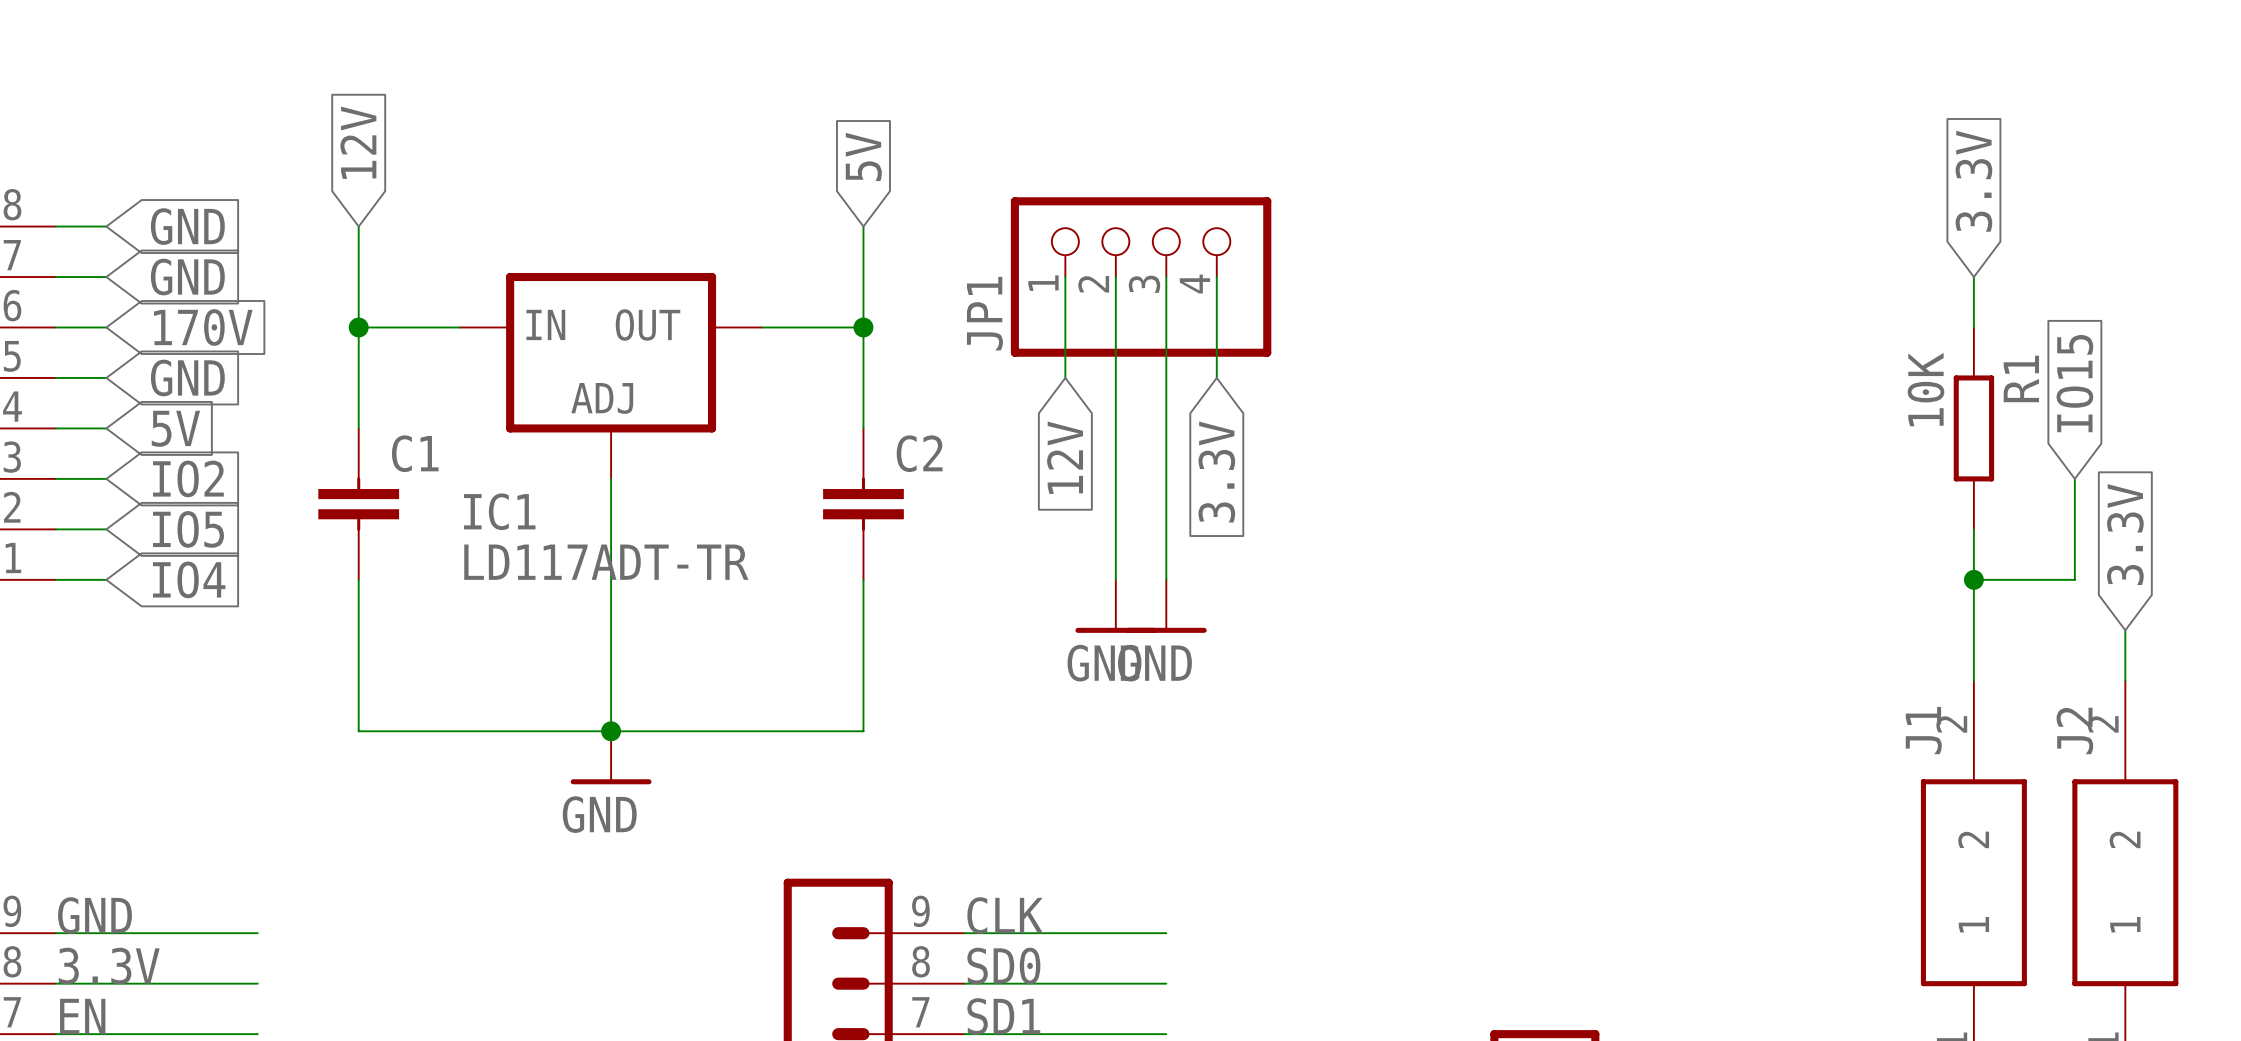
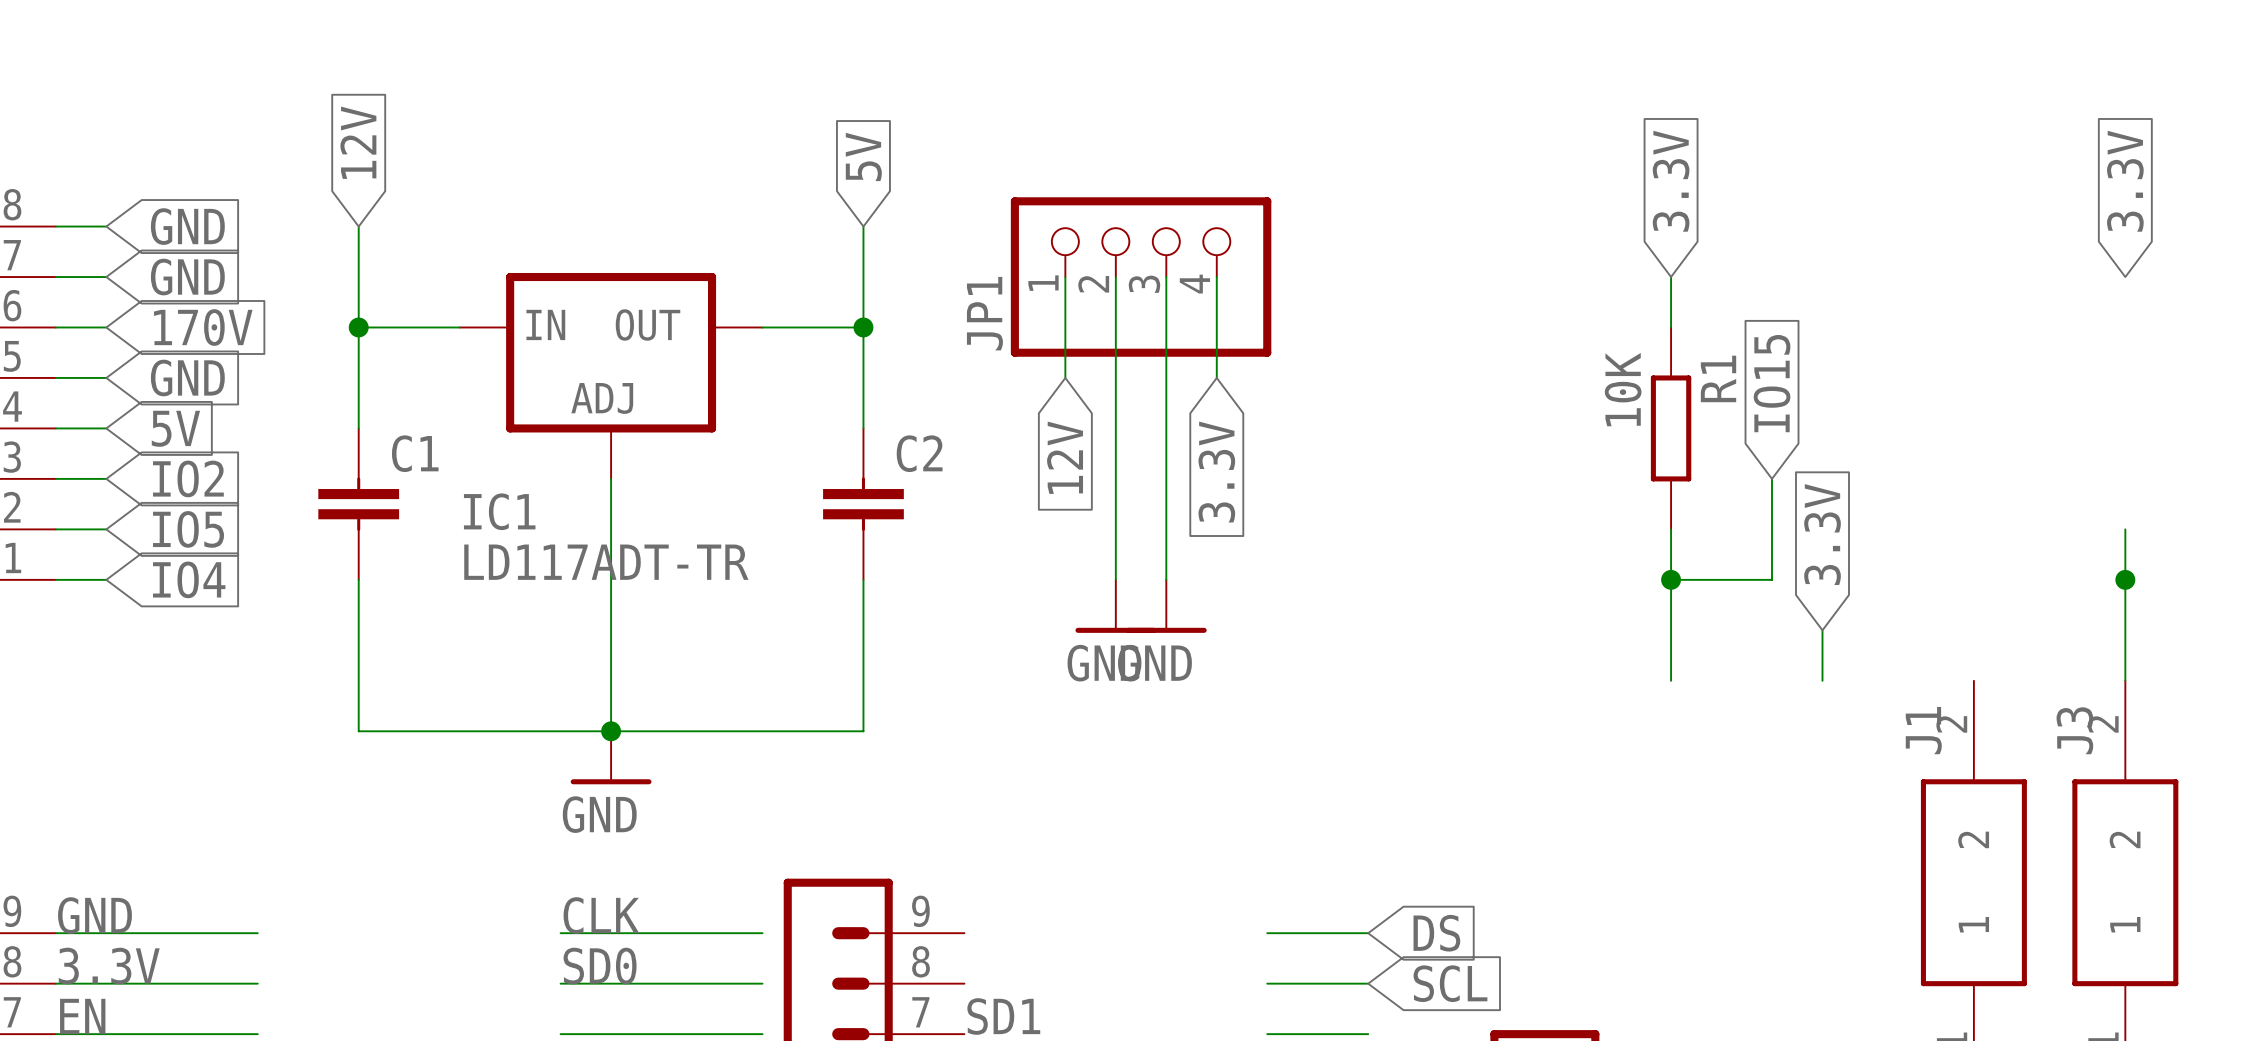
global label: none -> 3.3V (1671, 181)
global label: 3.3V (1973, 181) -> none
global label: none -> 3.3V (2125, 181)
wire: (1973, 277) (1973, 327) -> (1671, 277) (1671, 327)
global label position: IO15 (2074, 383) -> IO15 (1772, 383)
R1 position: (1973, 428) -> (1671, 428)
wire: (2074, 478) (2074, 579) (1973, 579) -> (1772, 478) (1772, 579) (1671, 579)
wire: (1973, 529) (1973, 680) -> (1671, 529) (1671, 680)
wire: none -> (2125, 529) (2125, 630)
global label: none -> 3.3V (1822, 534)
global label: 3.3V (2125, 534) -> none
junction: none -> (1671, 579)
junction: (1973, 579) -> none
junction: none -> (2125, 579)
wire: none -> (1822, 630) (1822, 680)
J2 name: J2 (2074, 730) -> J3 (2074, 730)
label position: CLK (1005, 915) -> CLK (601, 915)
wire: (964, 933) (1166, 933) -> (560, 933) (762, 933)
wire: none -> (1267, 933) (1368, 933)
global label: none -> DS (1436, 933)
label position: SD0 (1003, 966) -> SD0 (600, 966)
wire: (964, 983) (1166, 983) -> (560, 983) (762, 983)
wire: none -> (1267, 983) (1368, 983)
global label: none -> SCL (1450, 983)
wire: (964, 1034) (1166, 1034) -> (560, 1034) (762, 1034)
wire: none -> (1267, 1034) (1368, 1034)

